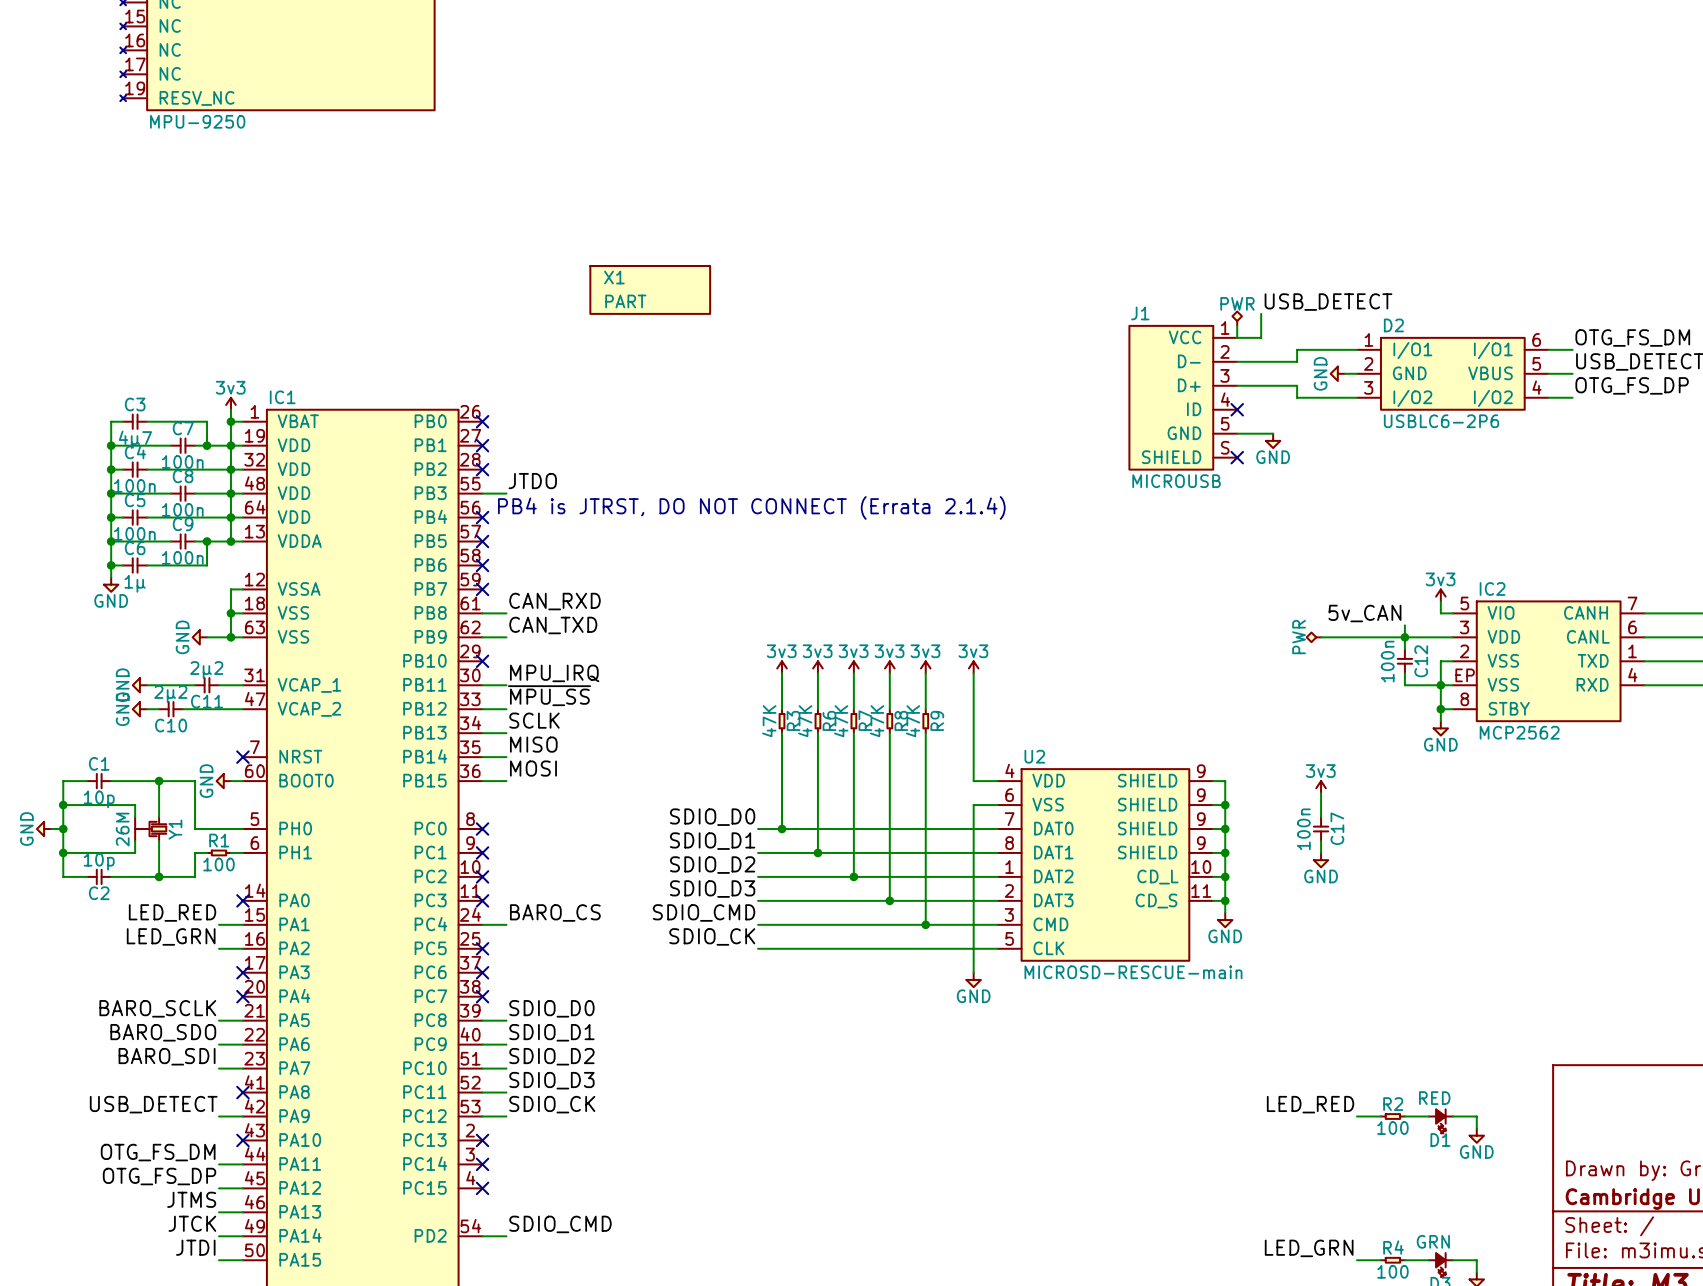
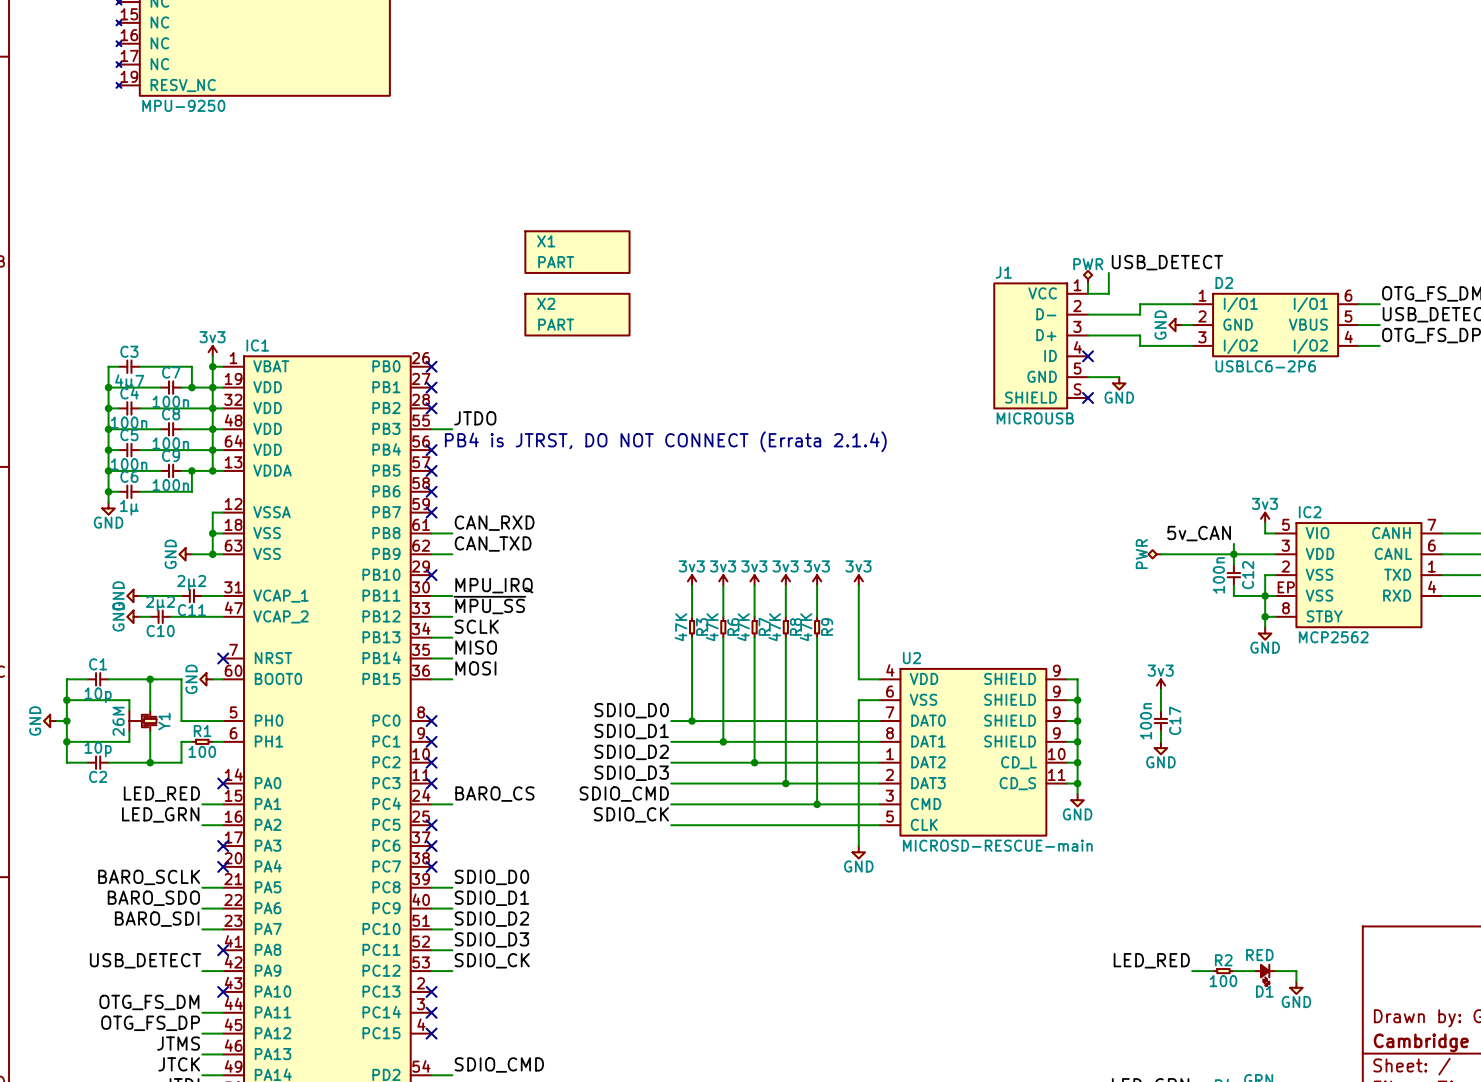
X2: none -> PART (577, 314)

